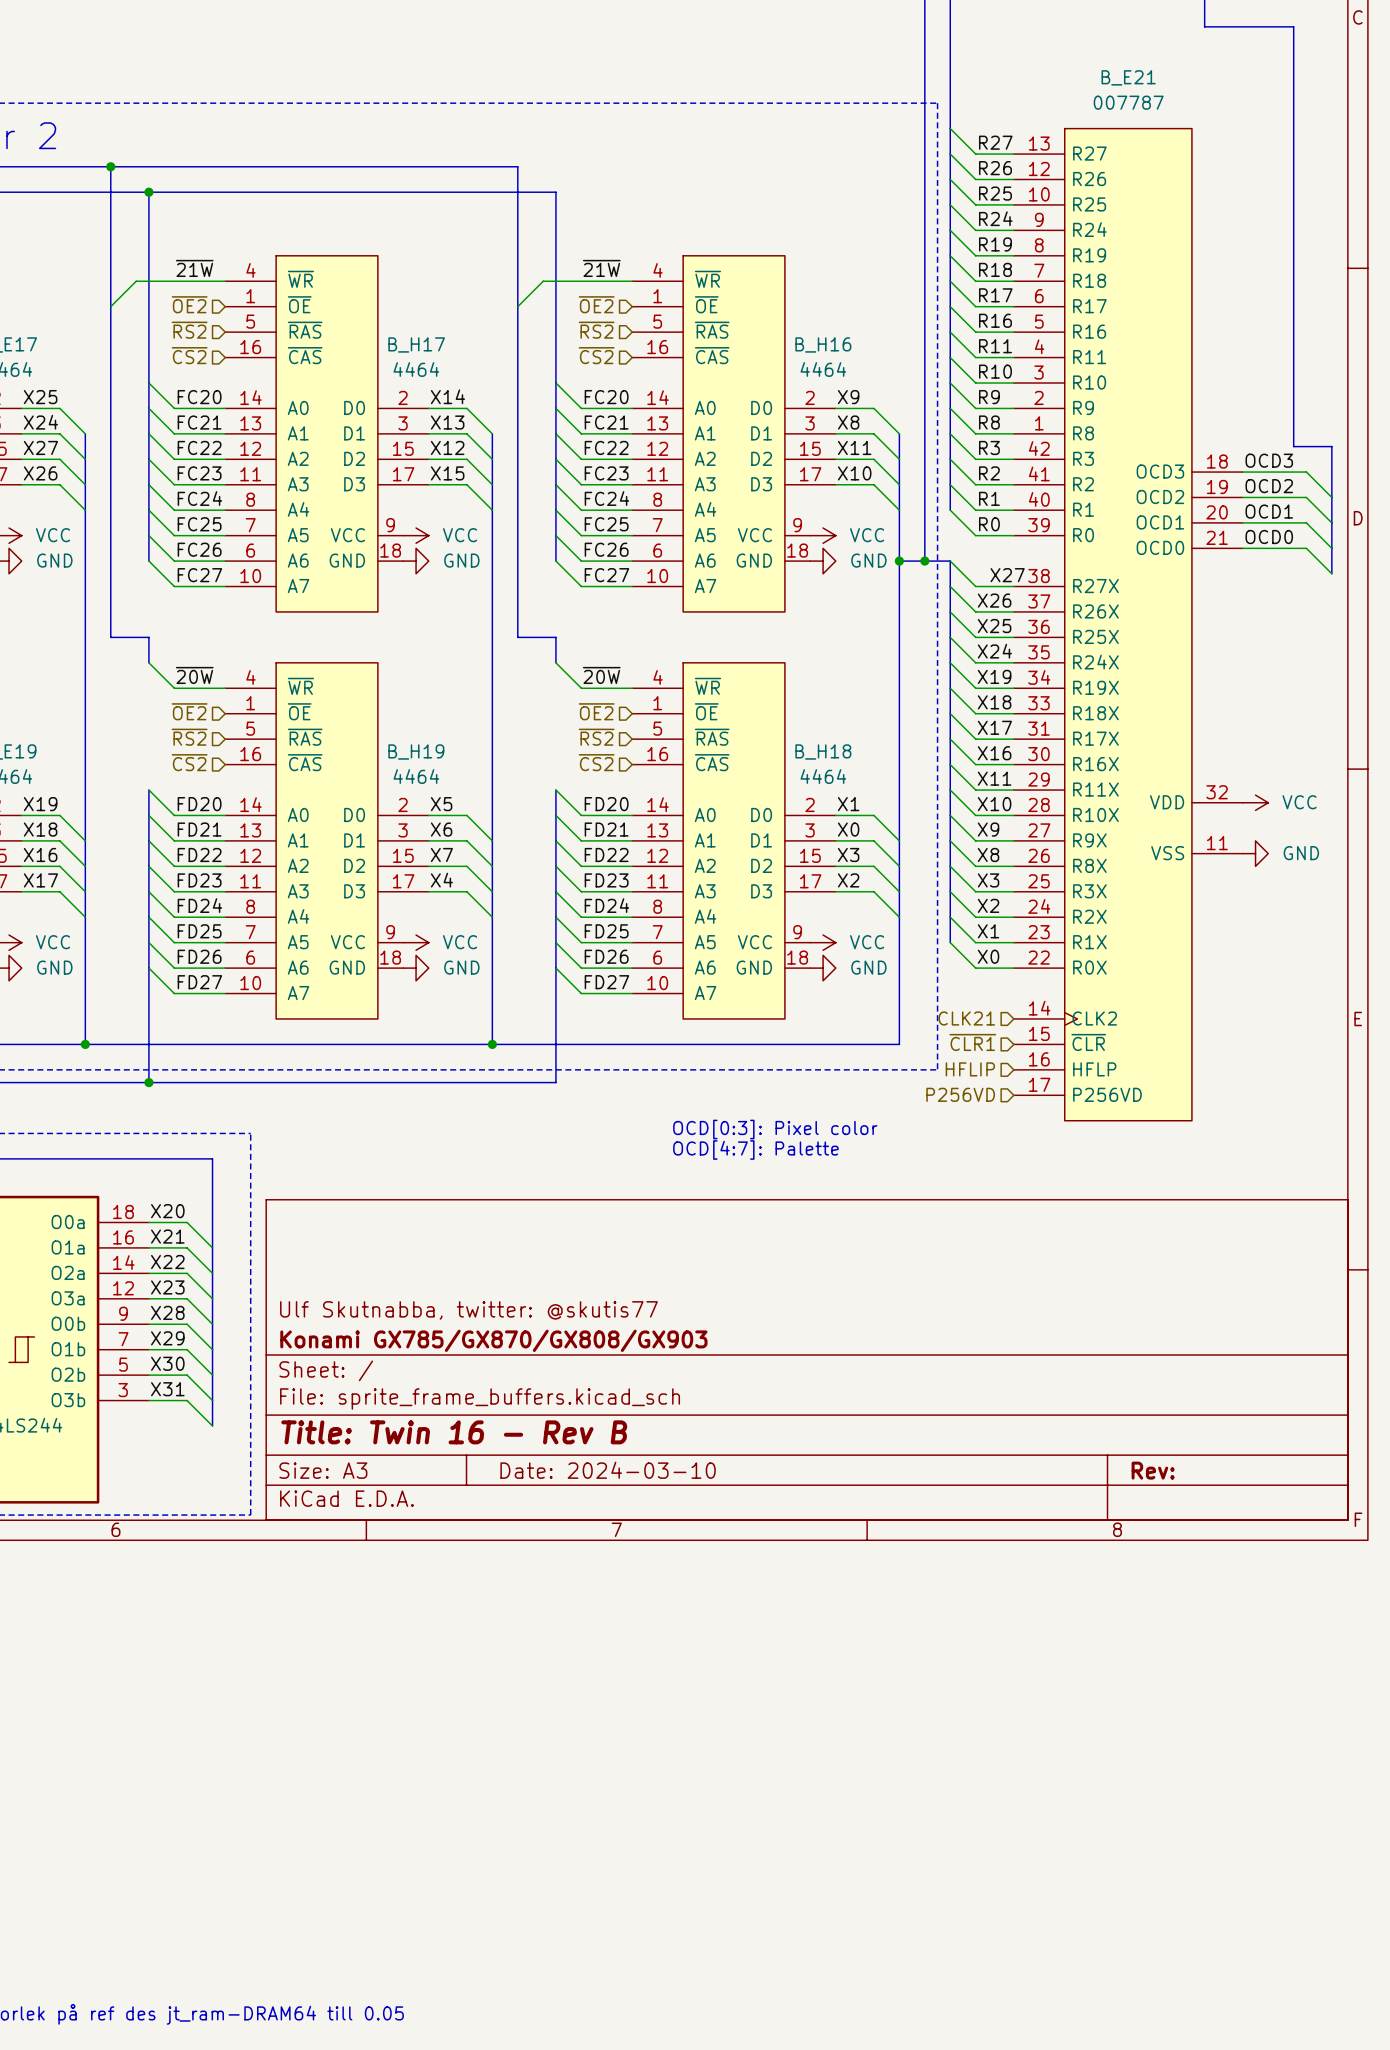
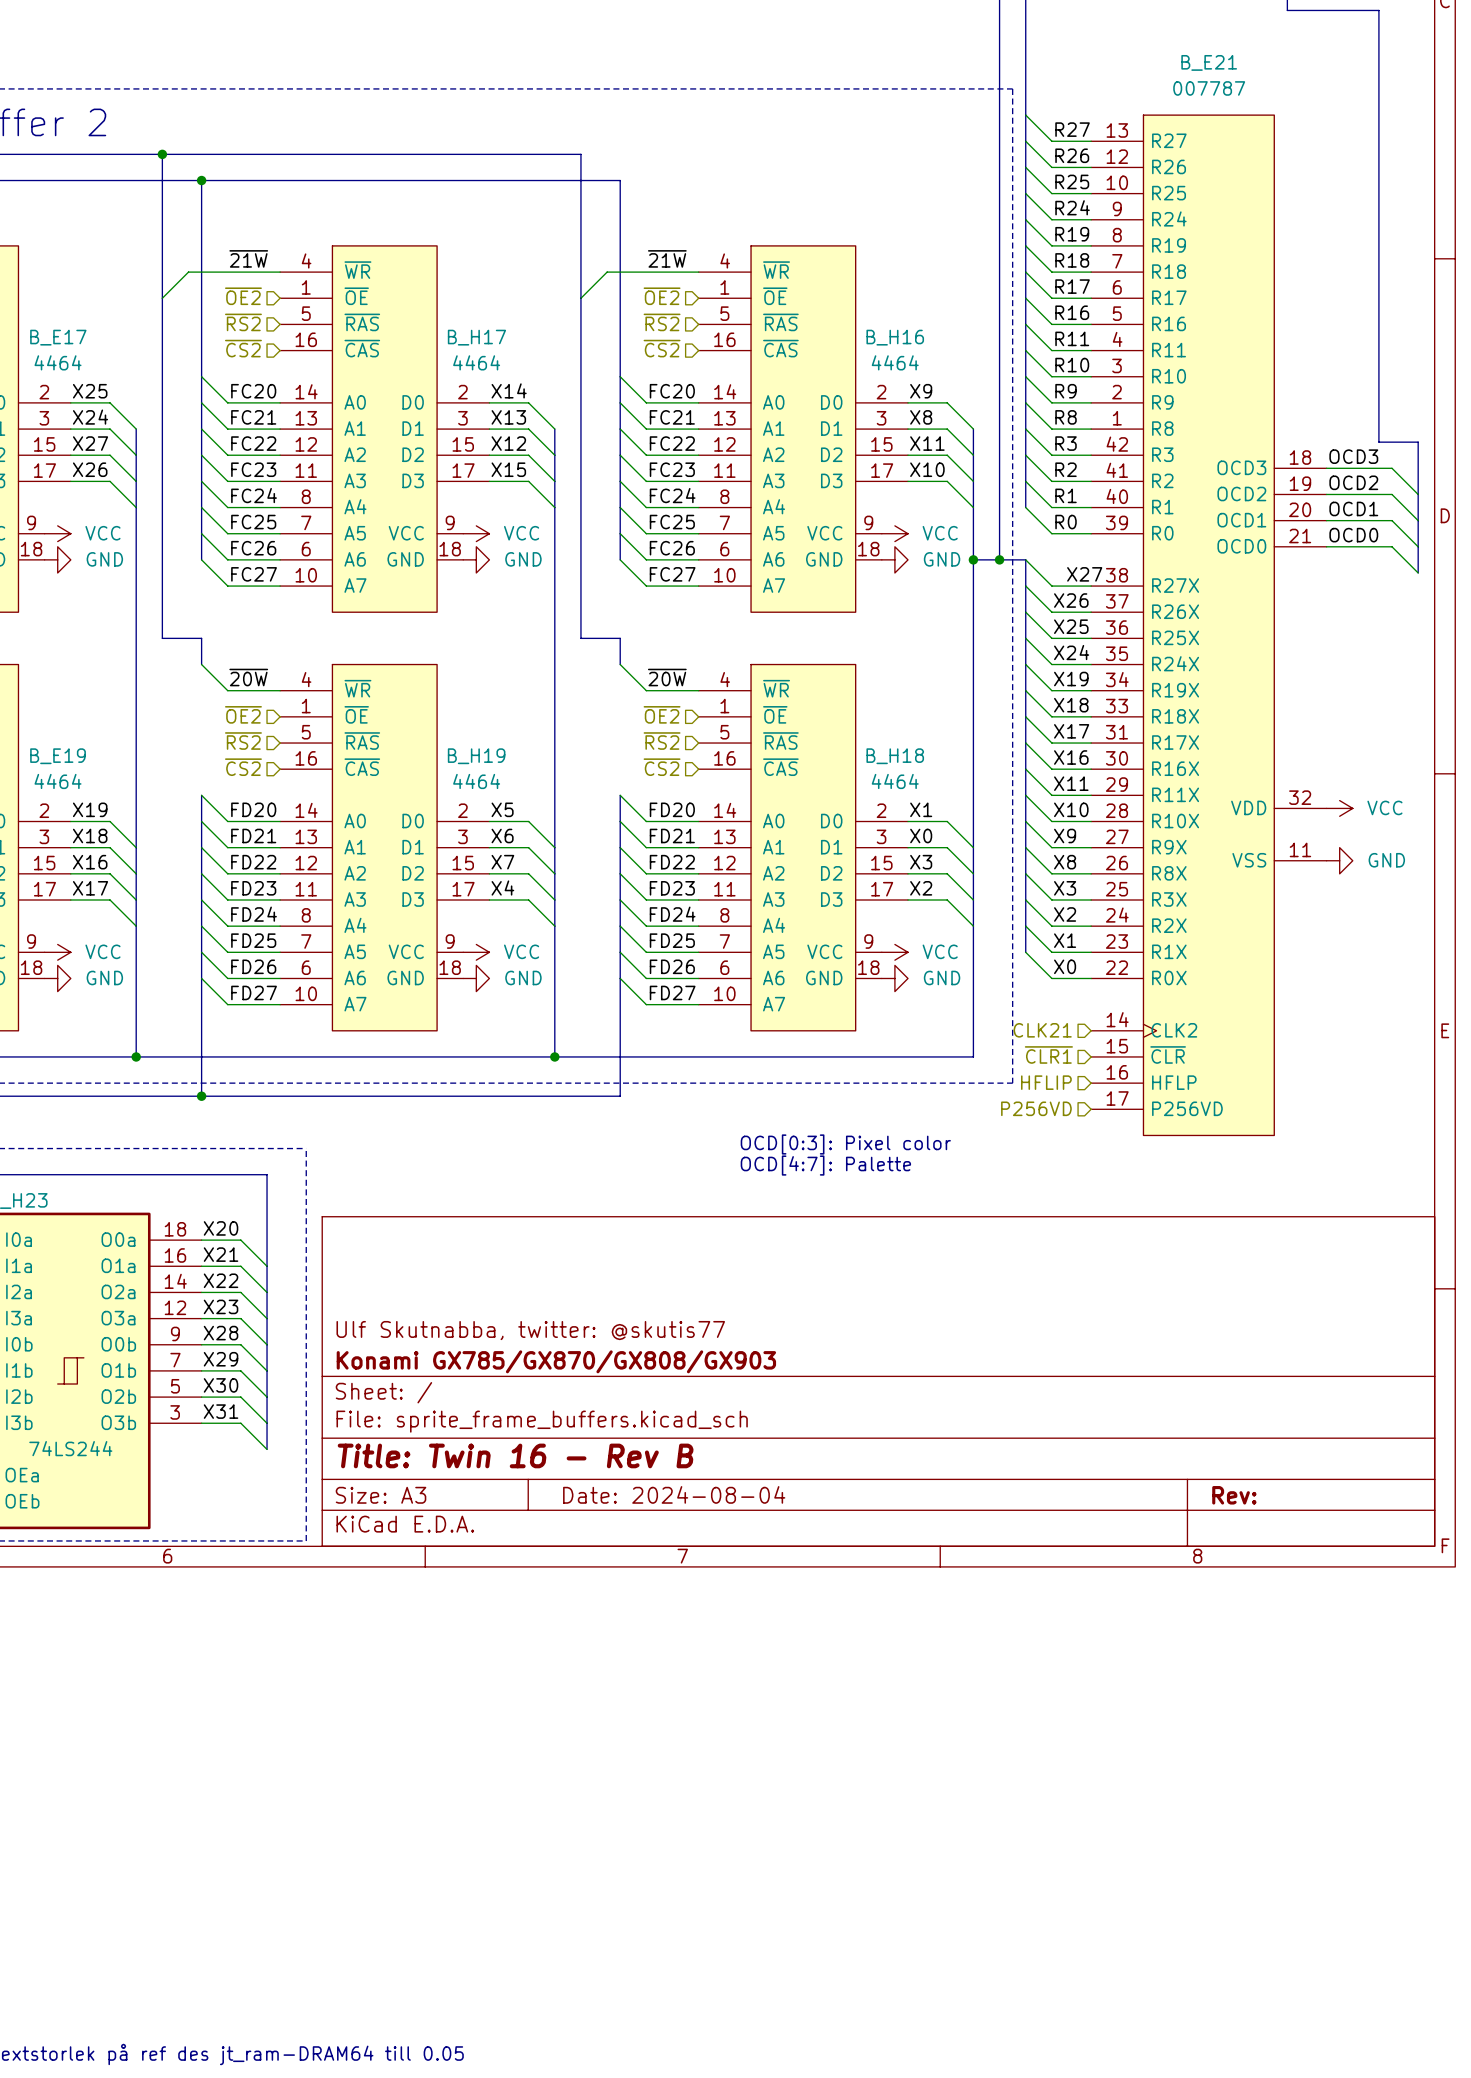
title block: Date: 2024-03-10 (608, 1470) -> Date: 2024-08-04 (674, 1494)

